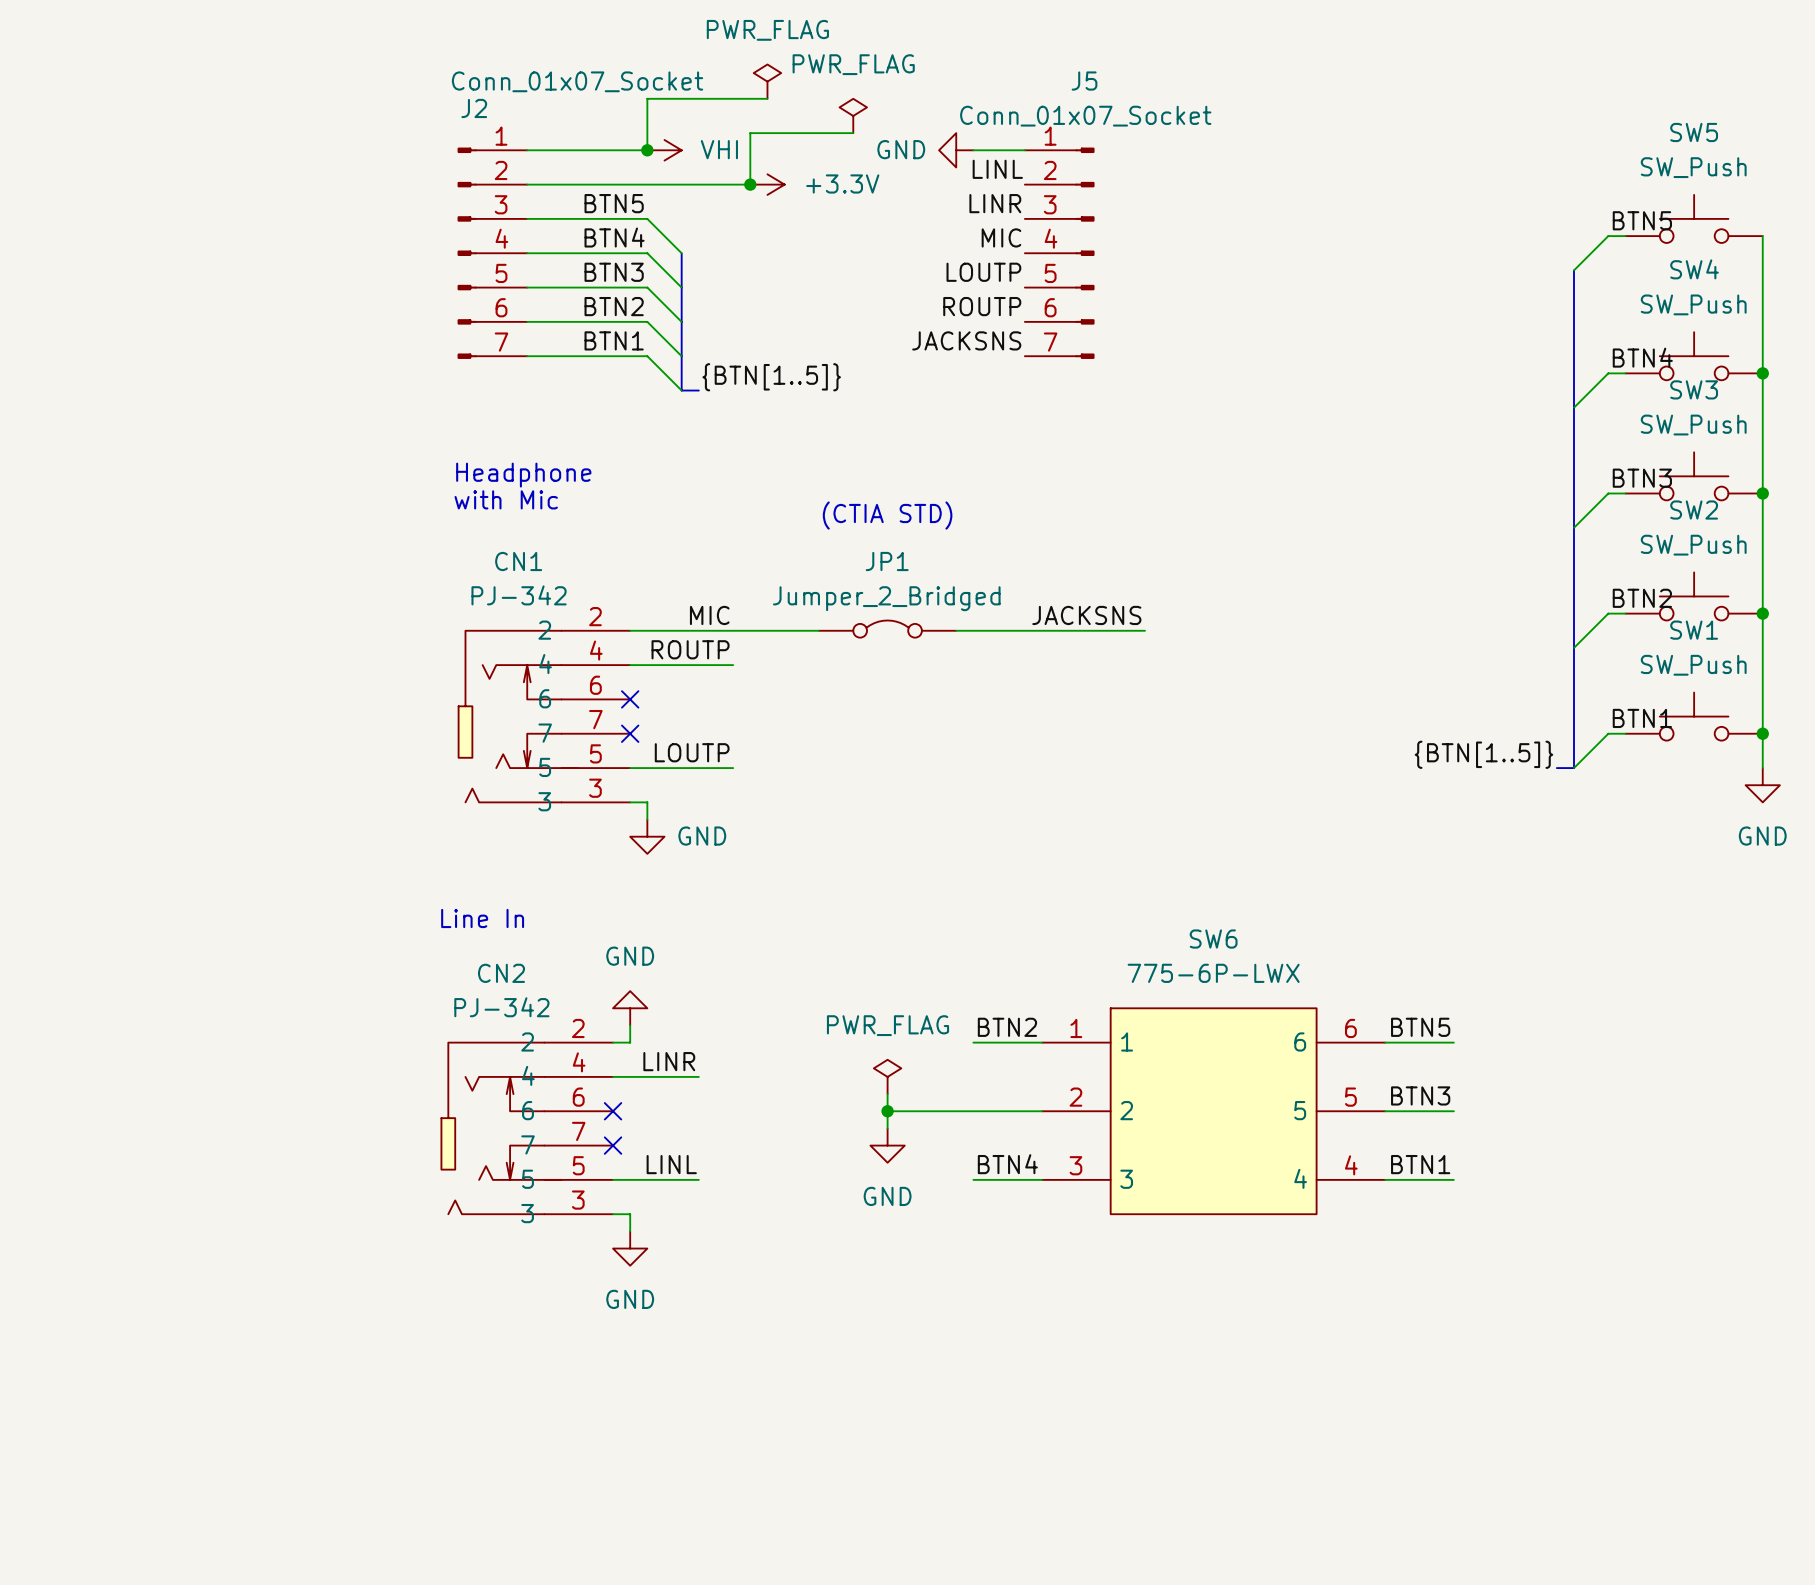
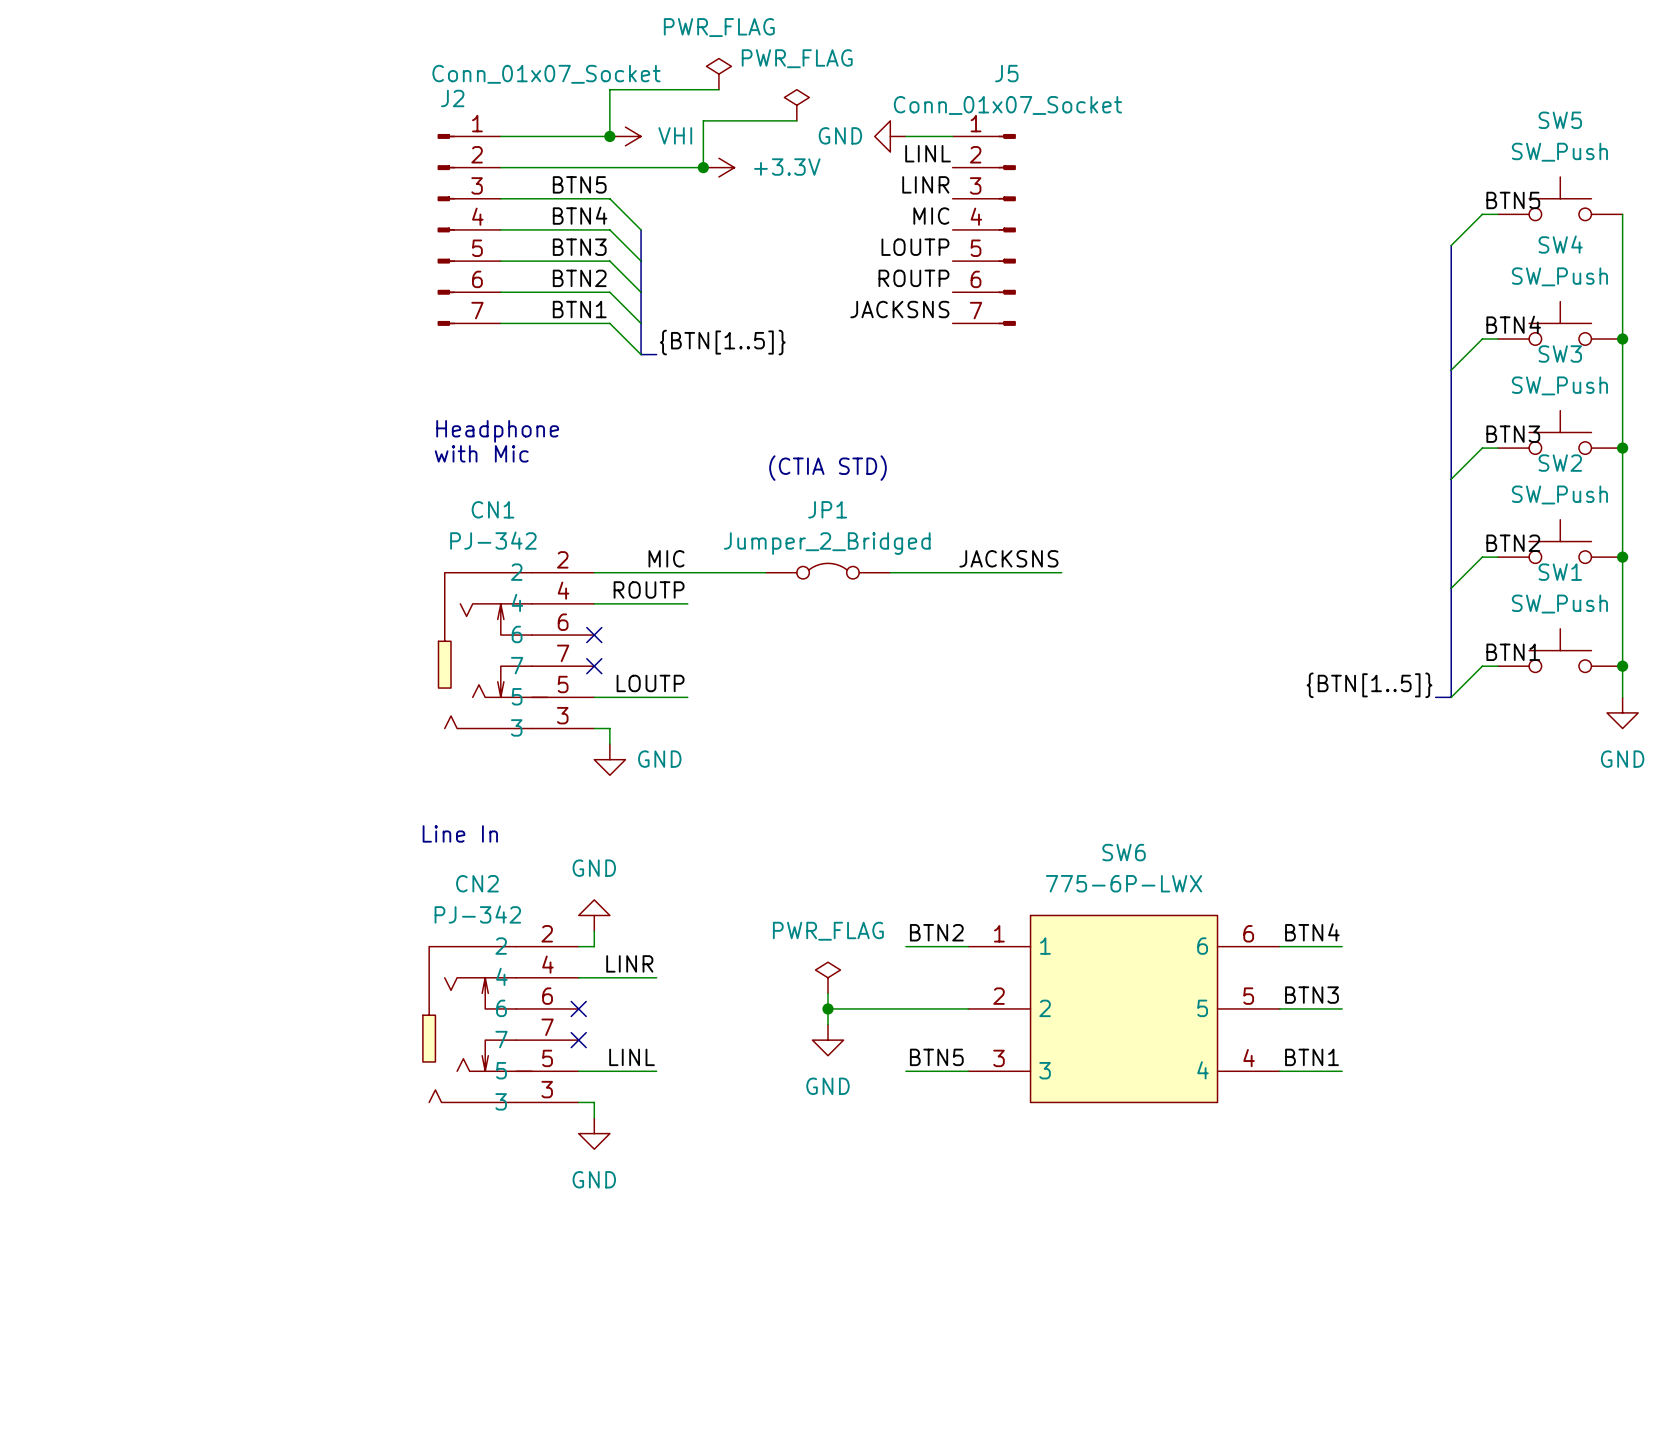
label: BTN5 (1420, 1027) -> BTN4 (1312, 932)
label: BTN4 (1007, 1164) -> BTN5 (936, 1057)

